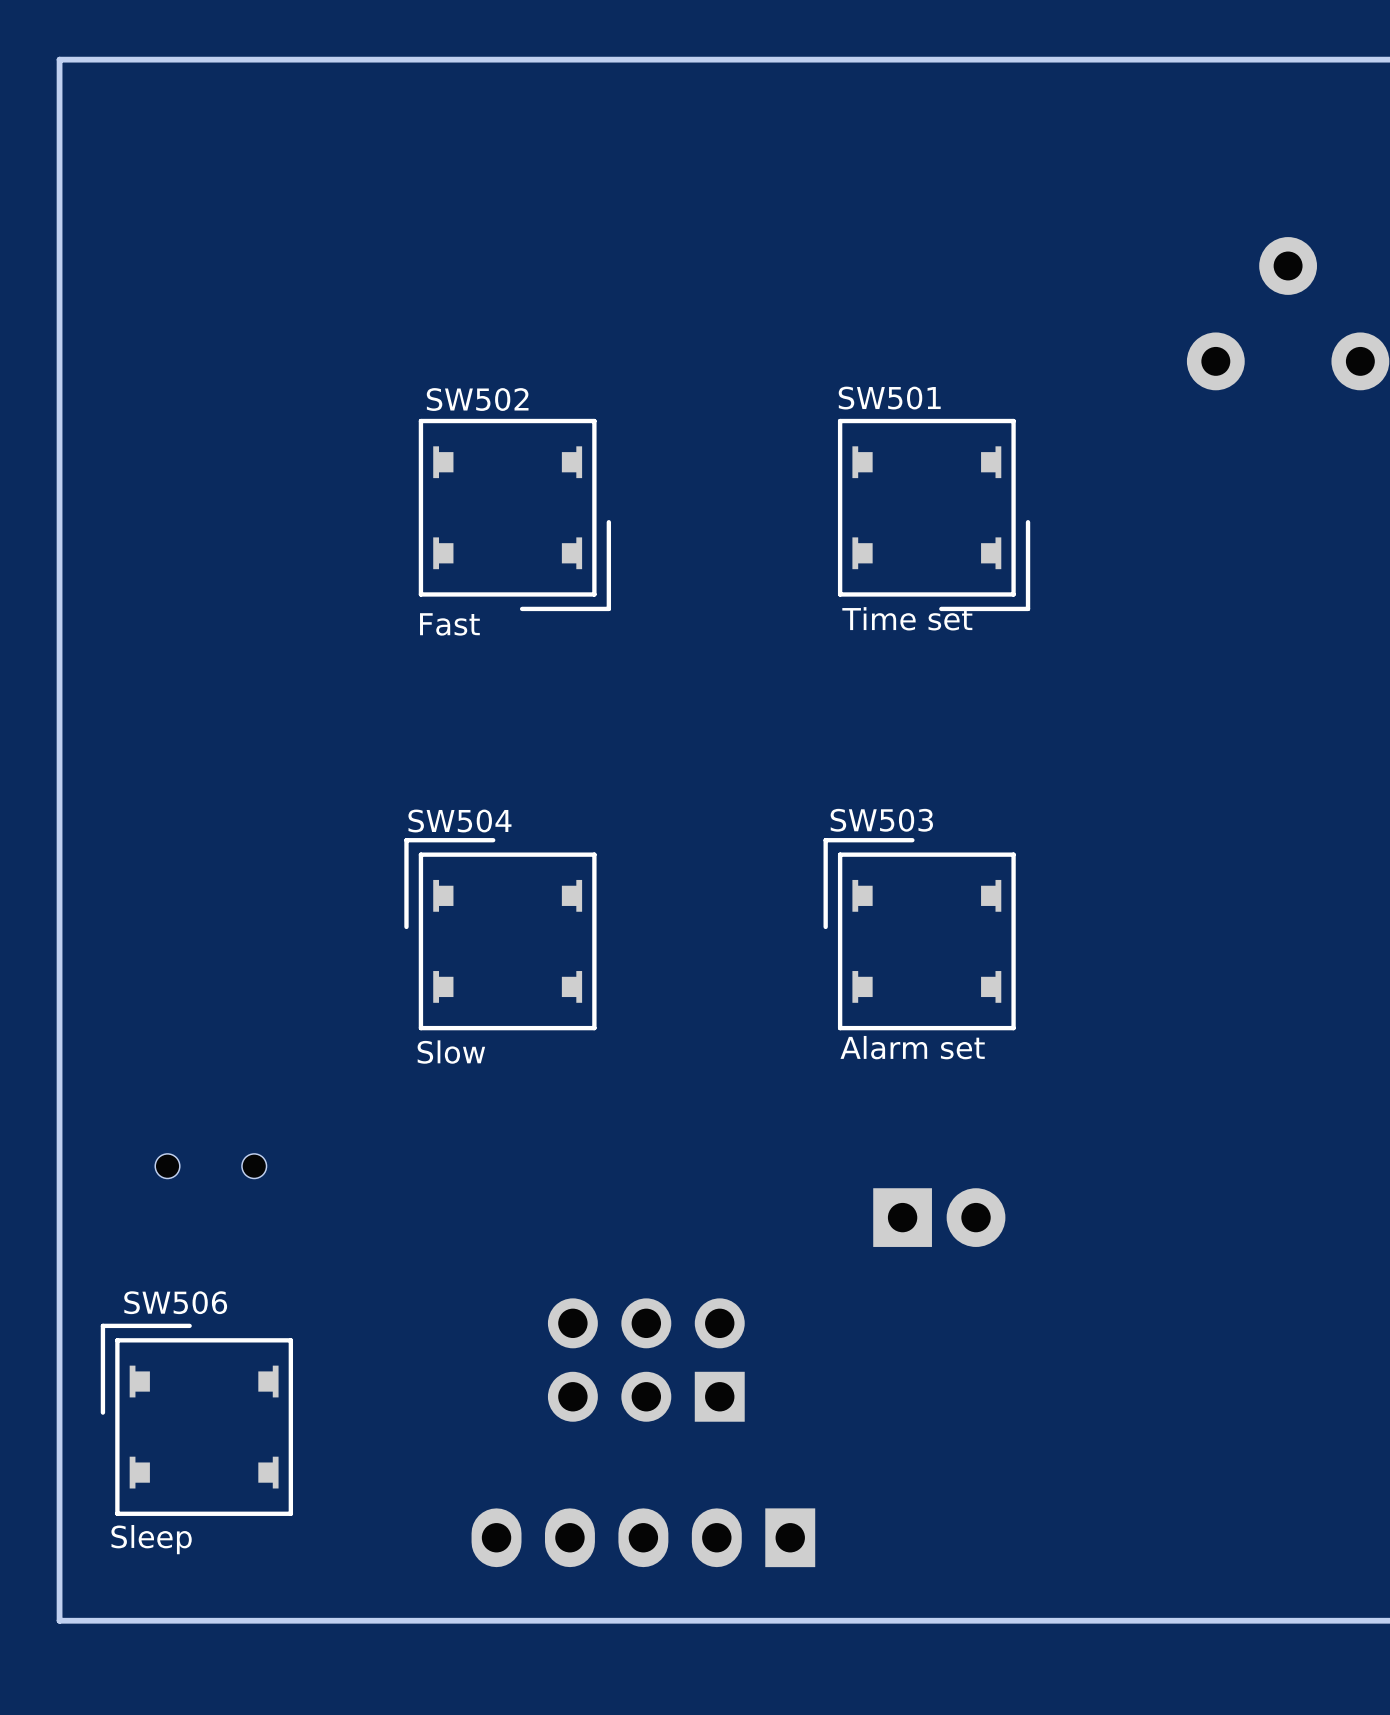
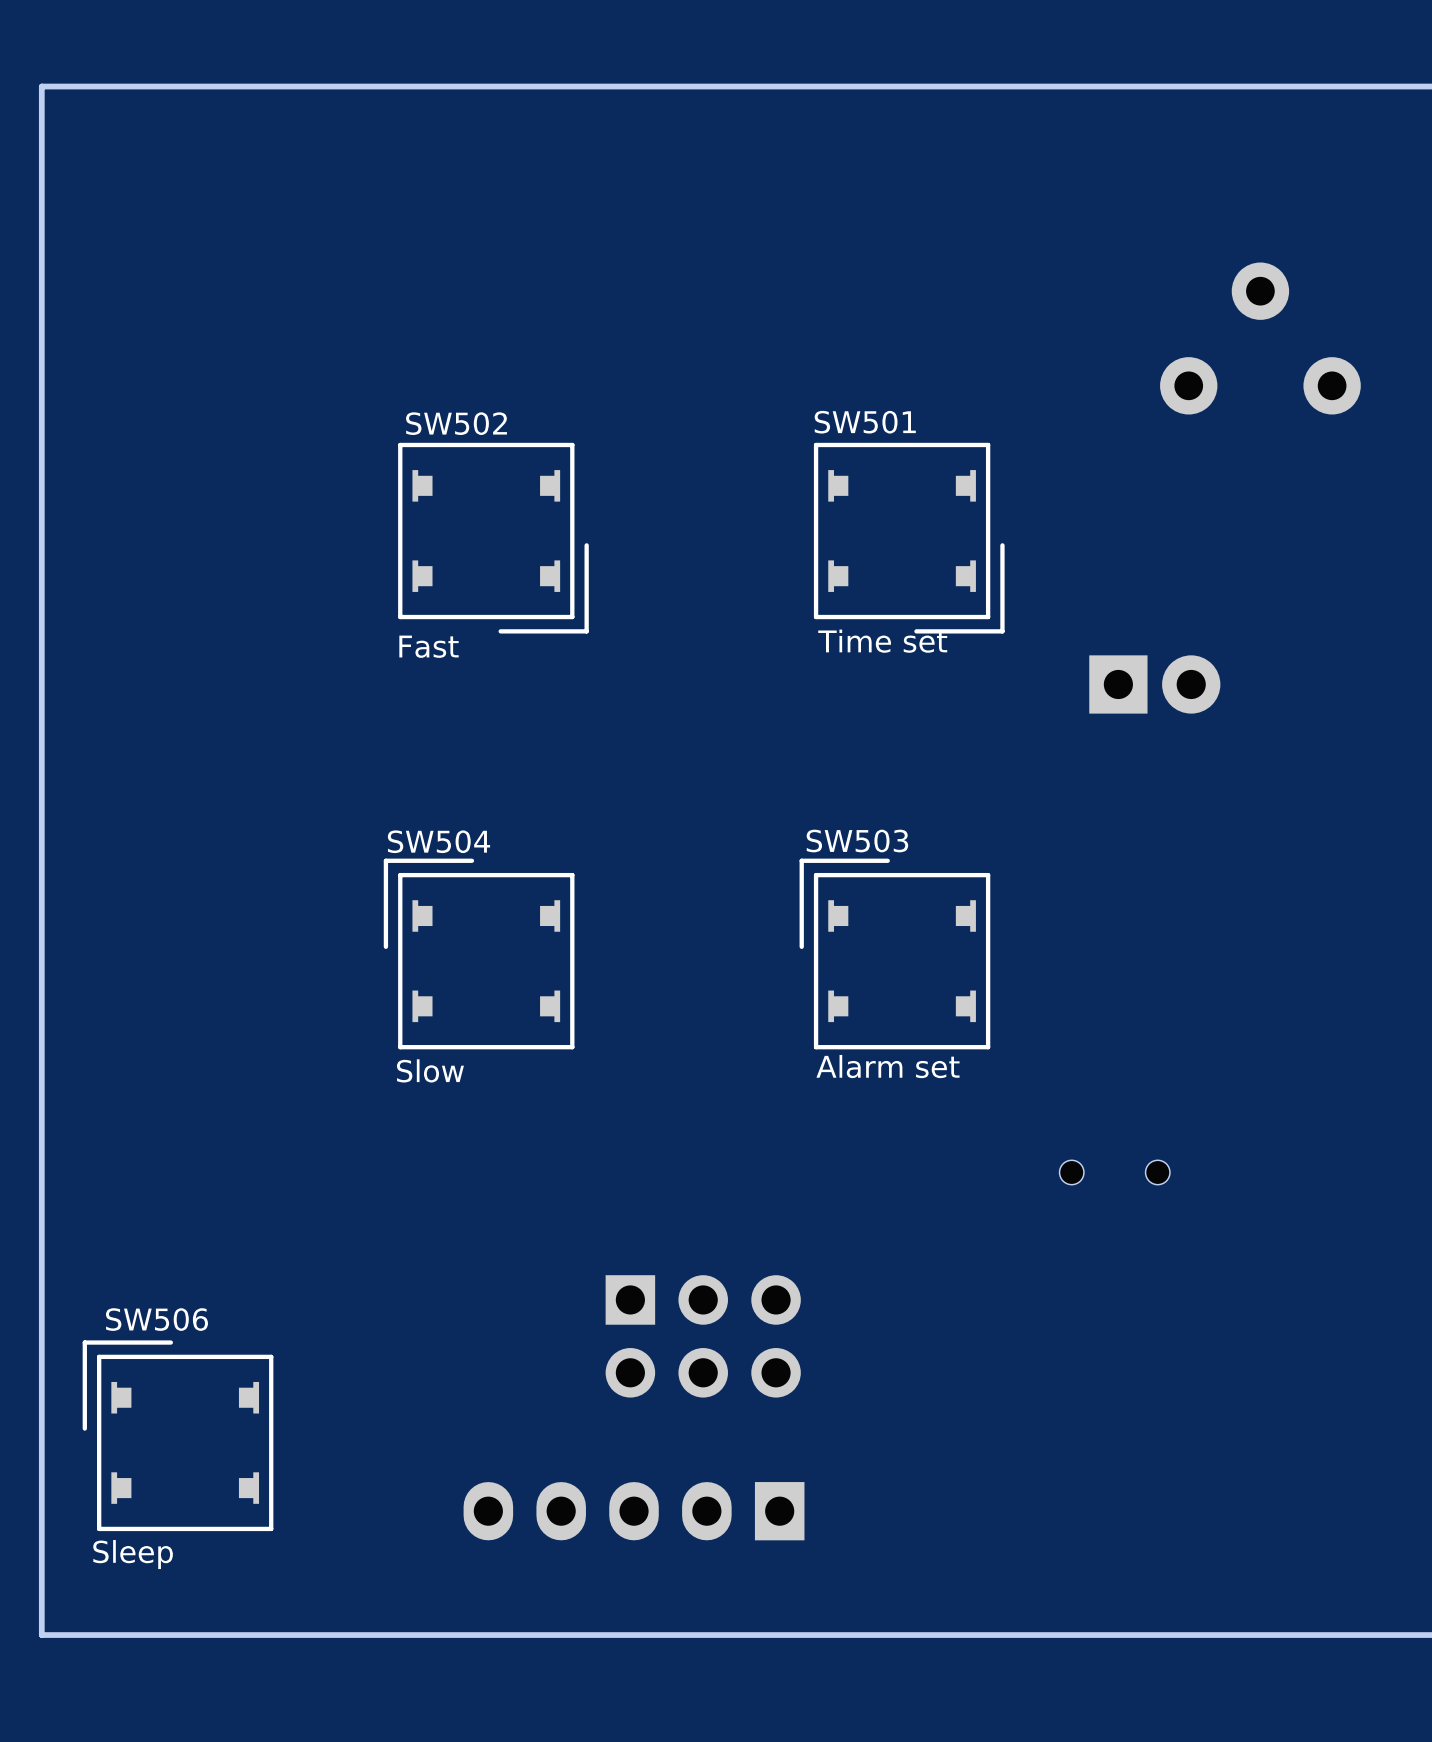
part: none -> (1114, 1172)
part: (210, 1166) -> none
part position: (939, 1217) -> (1154, 684)
part rotation: 0° (646, 1360) -> 180° (703, 1336)
part position: (643, 1537) -> (634, 1511)

